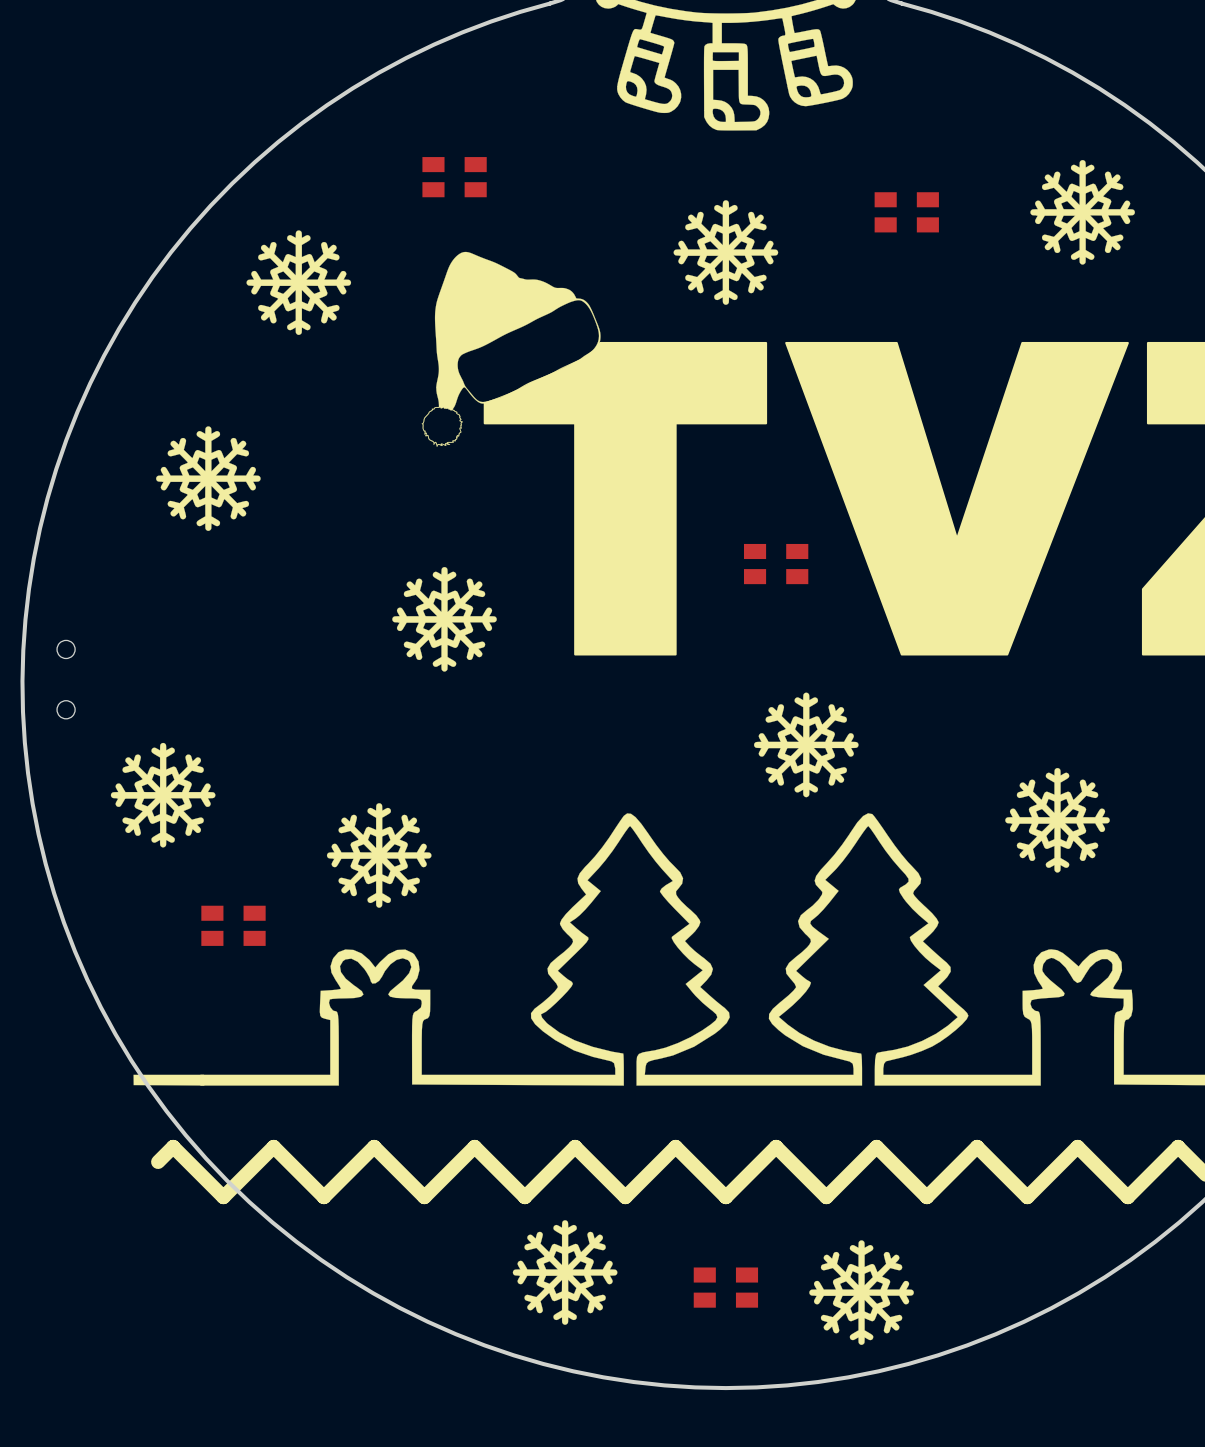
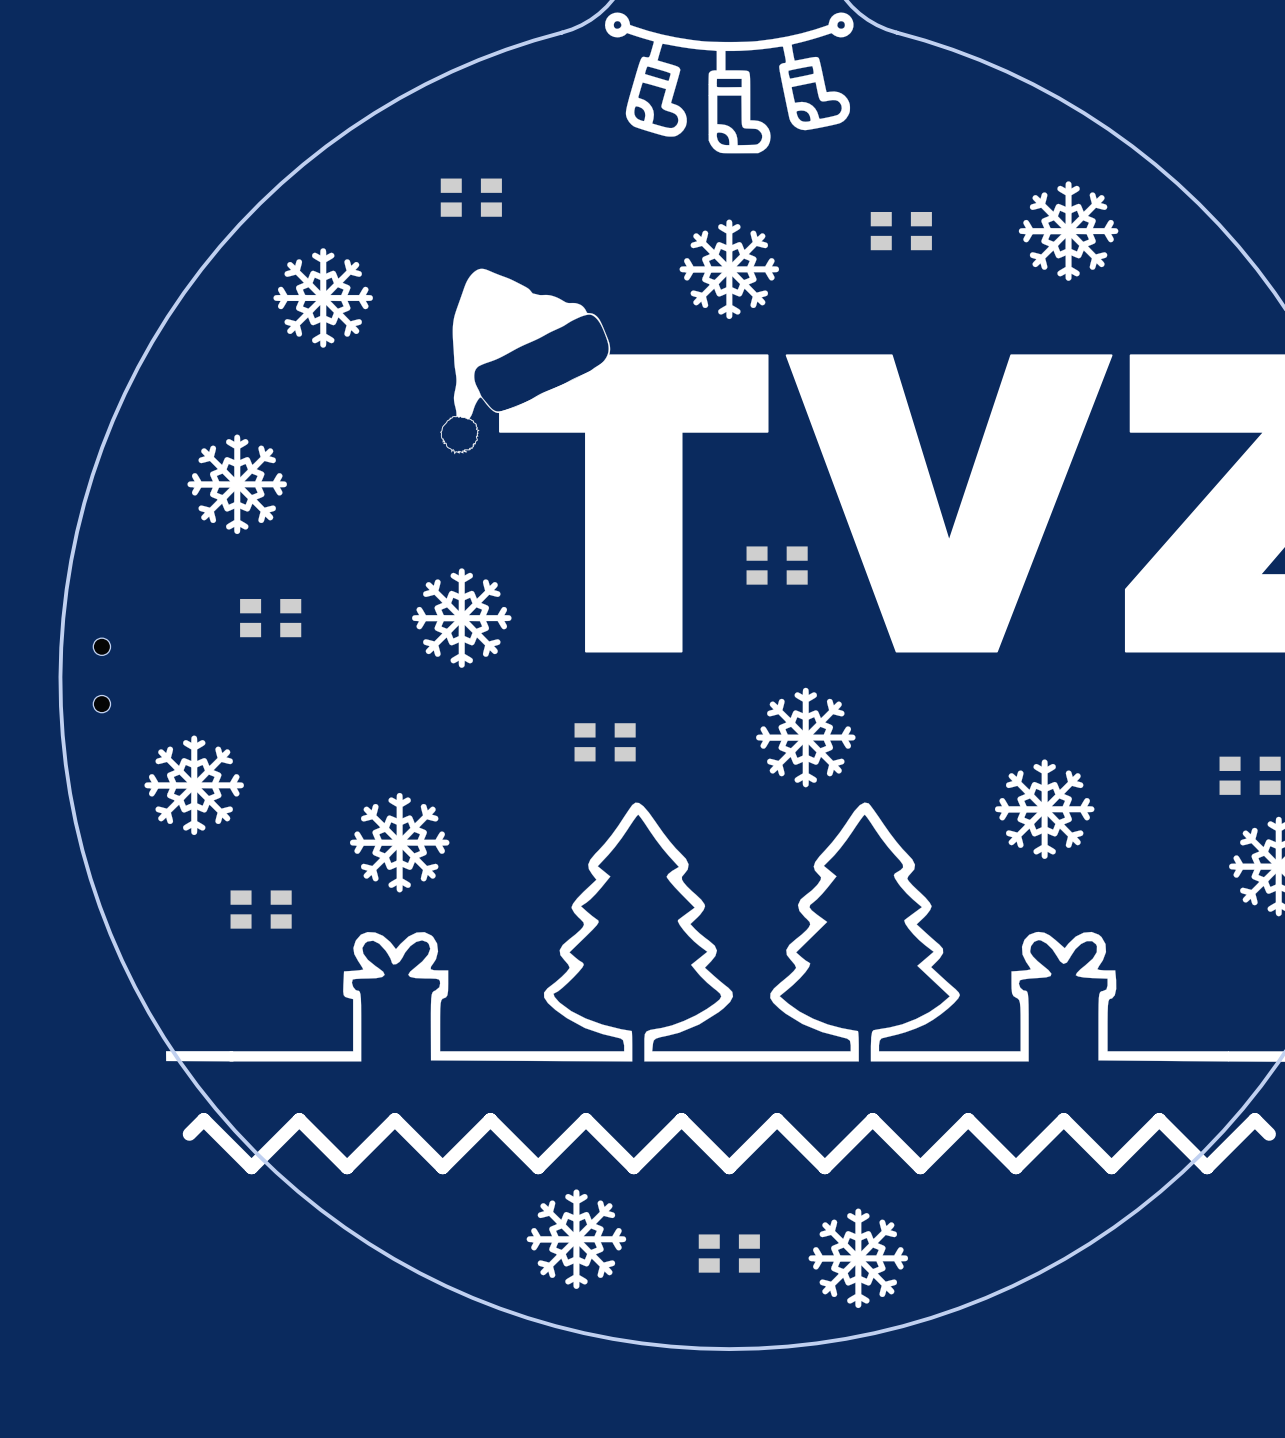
part: none -> (270, 618)
part: none -> (605, 742)

